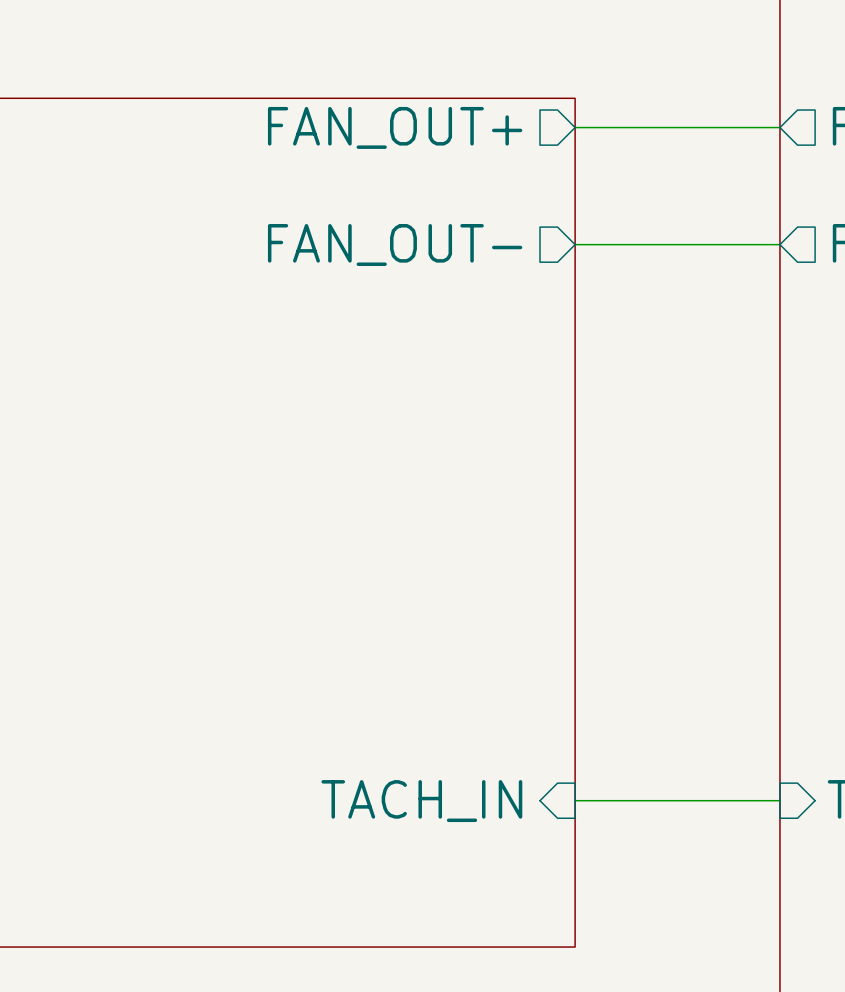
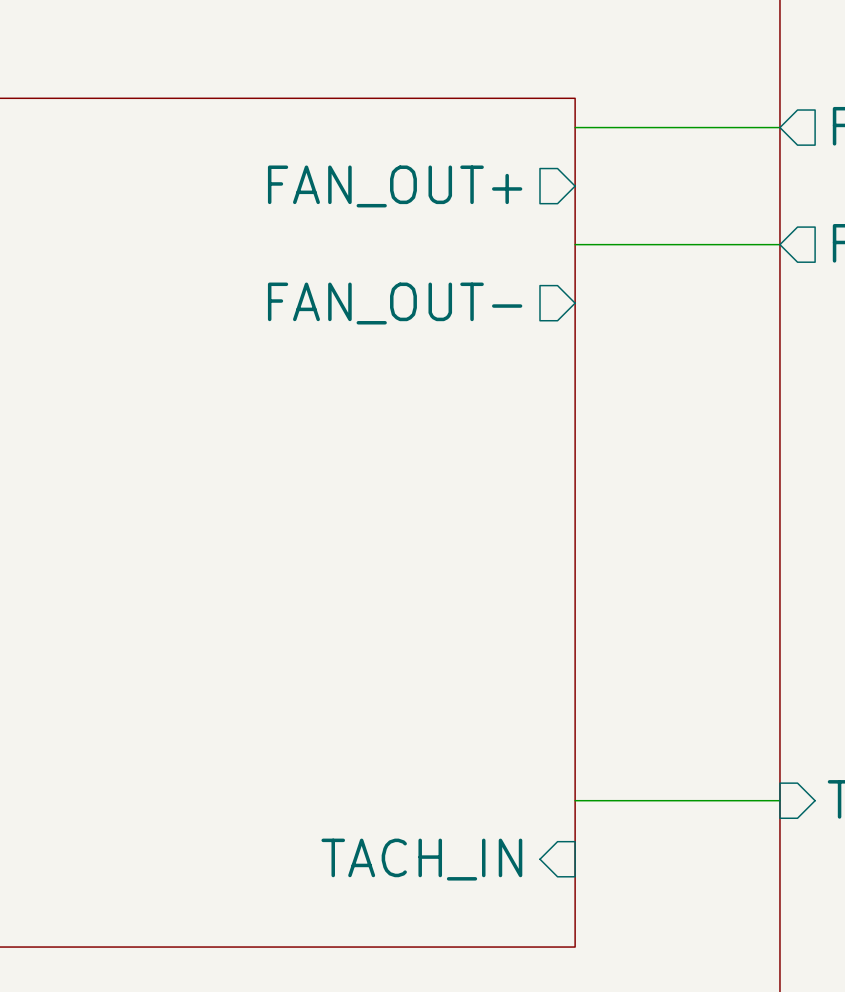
sheet pin position: FAN_OUT+ (395, 127) -> FAN_OUT+ (395, 186)
sheet pin position: FAN_OUT- (395, 244) -> FAN_OUT- (395, 303)
sheet pin position: TACH_IN (421, 801) -> TACH_IN (421, 859)

